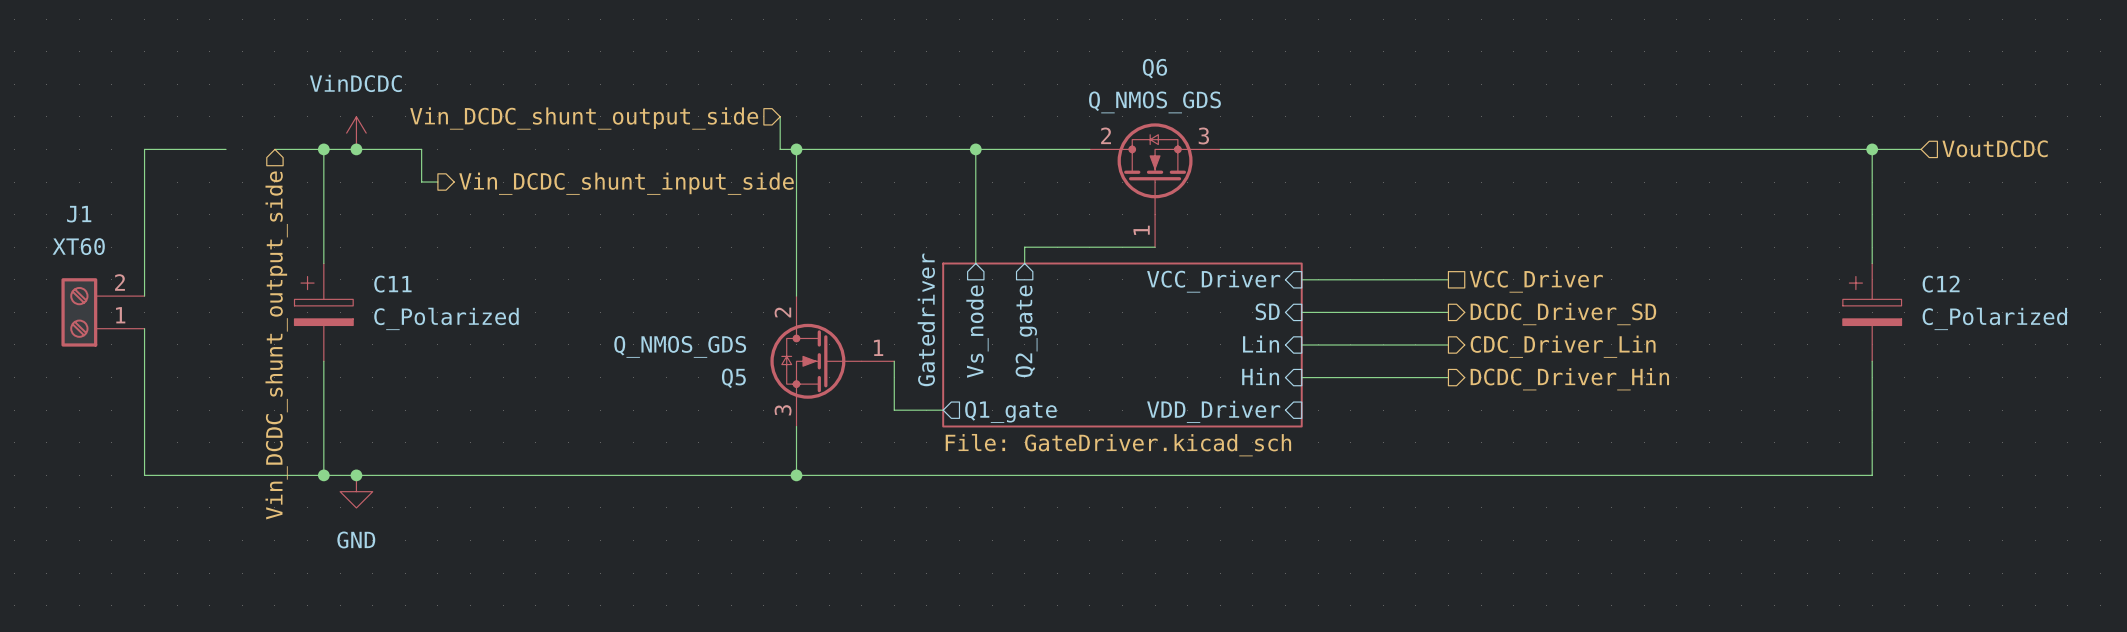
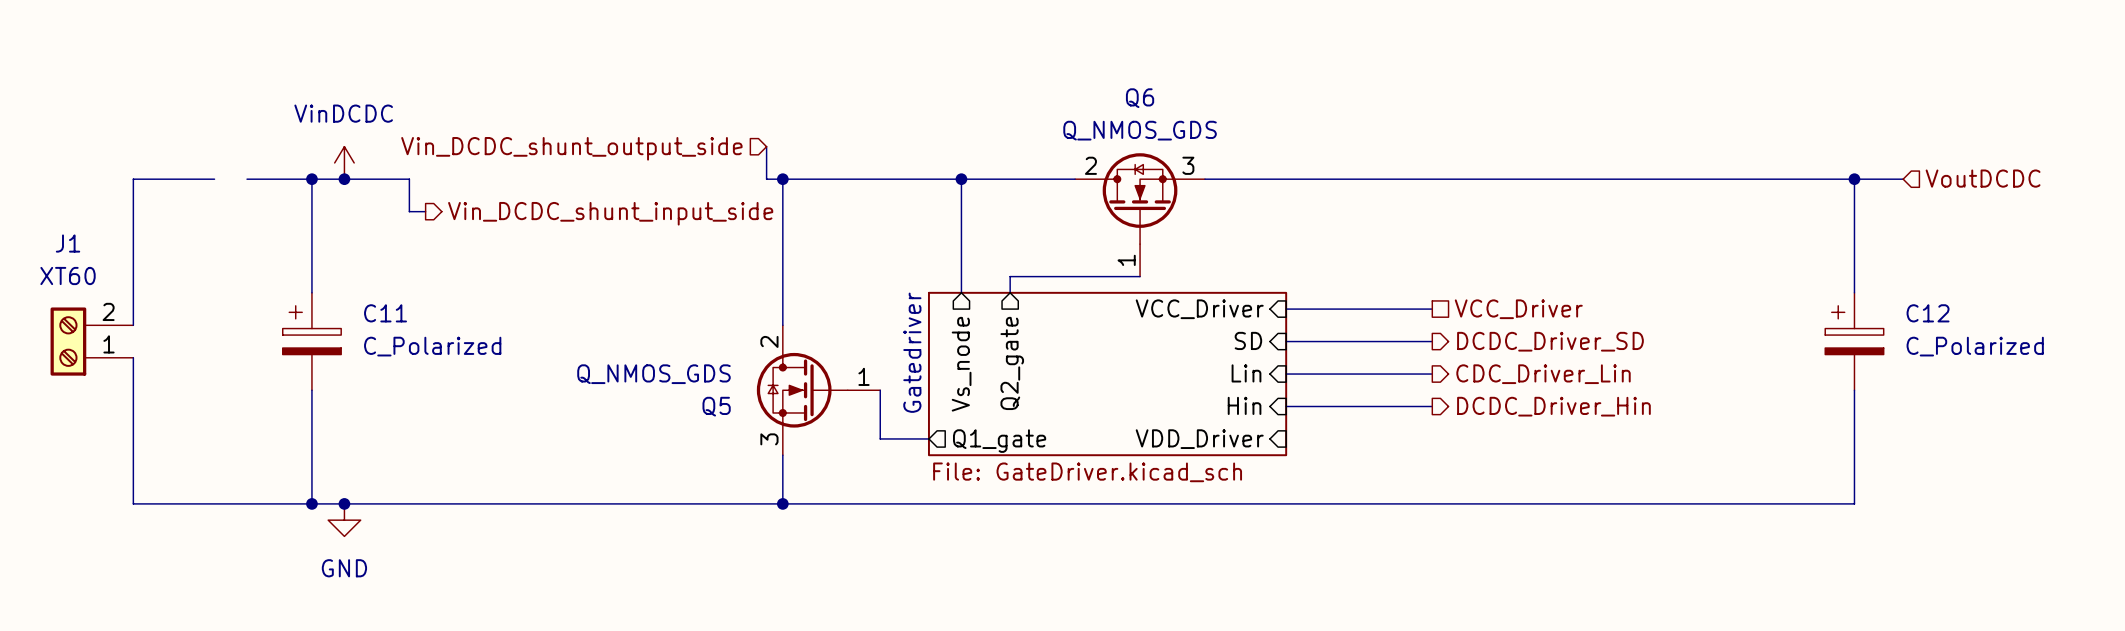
wire: none -> (247, 179) (263, 179)
hierarchical label: Vin_DCDC_shunt_output_side (276, 345) -> none

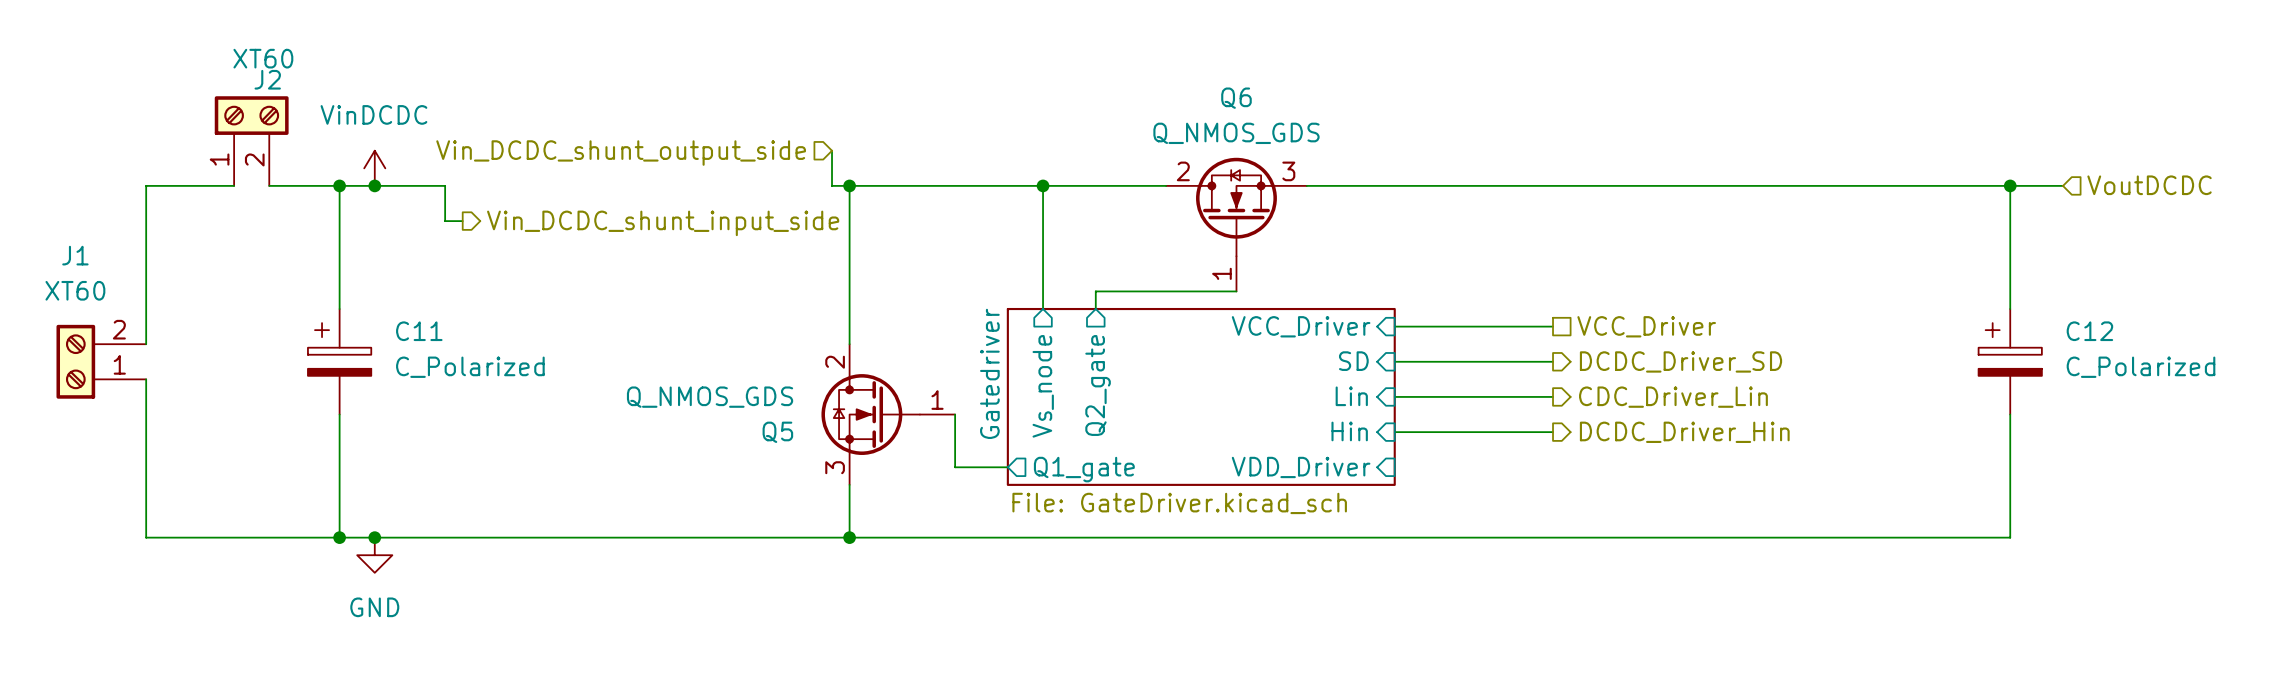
J2: none -> XT60 (251, 141)

